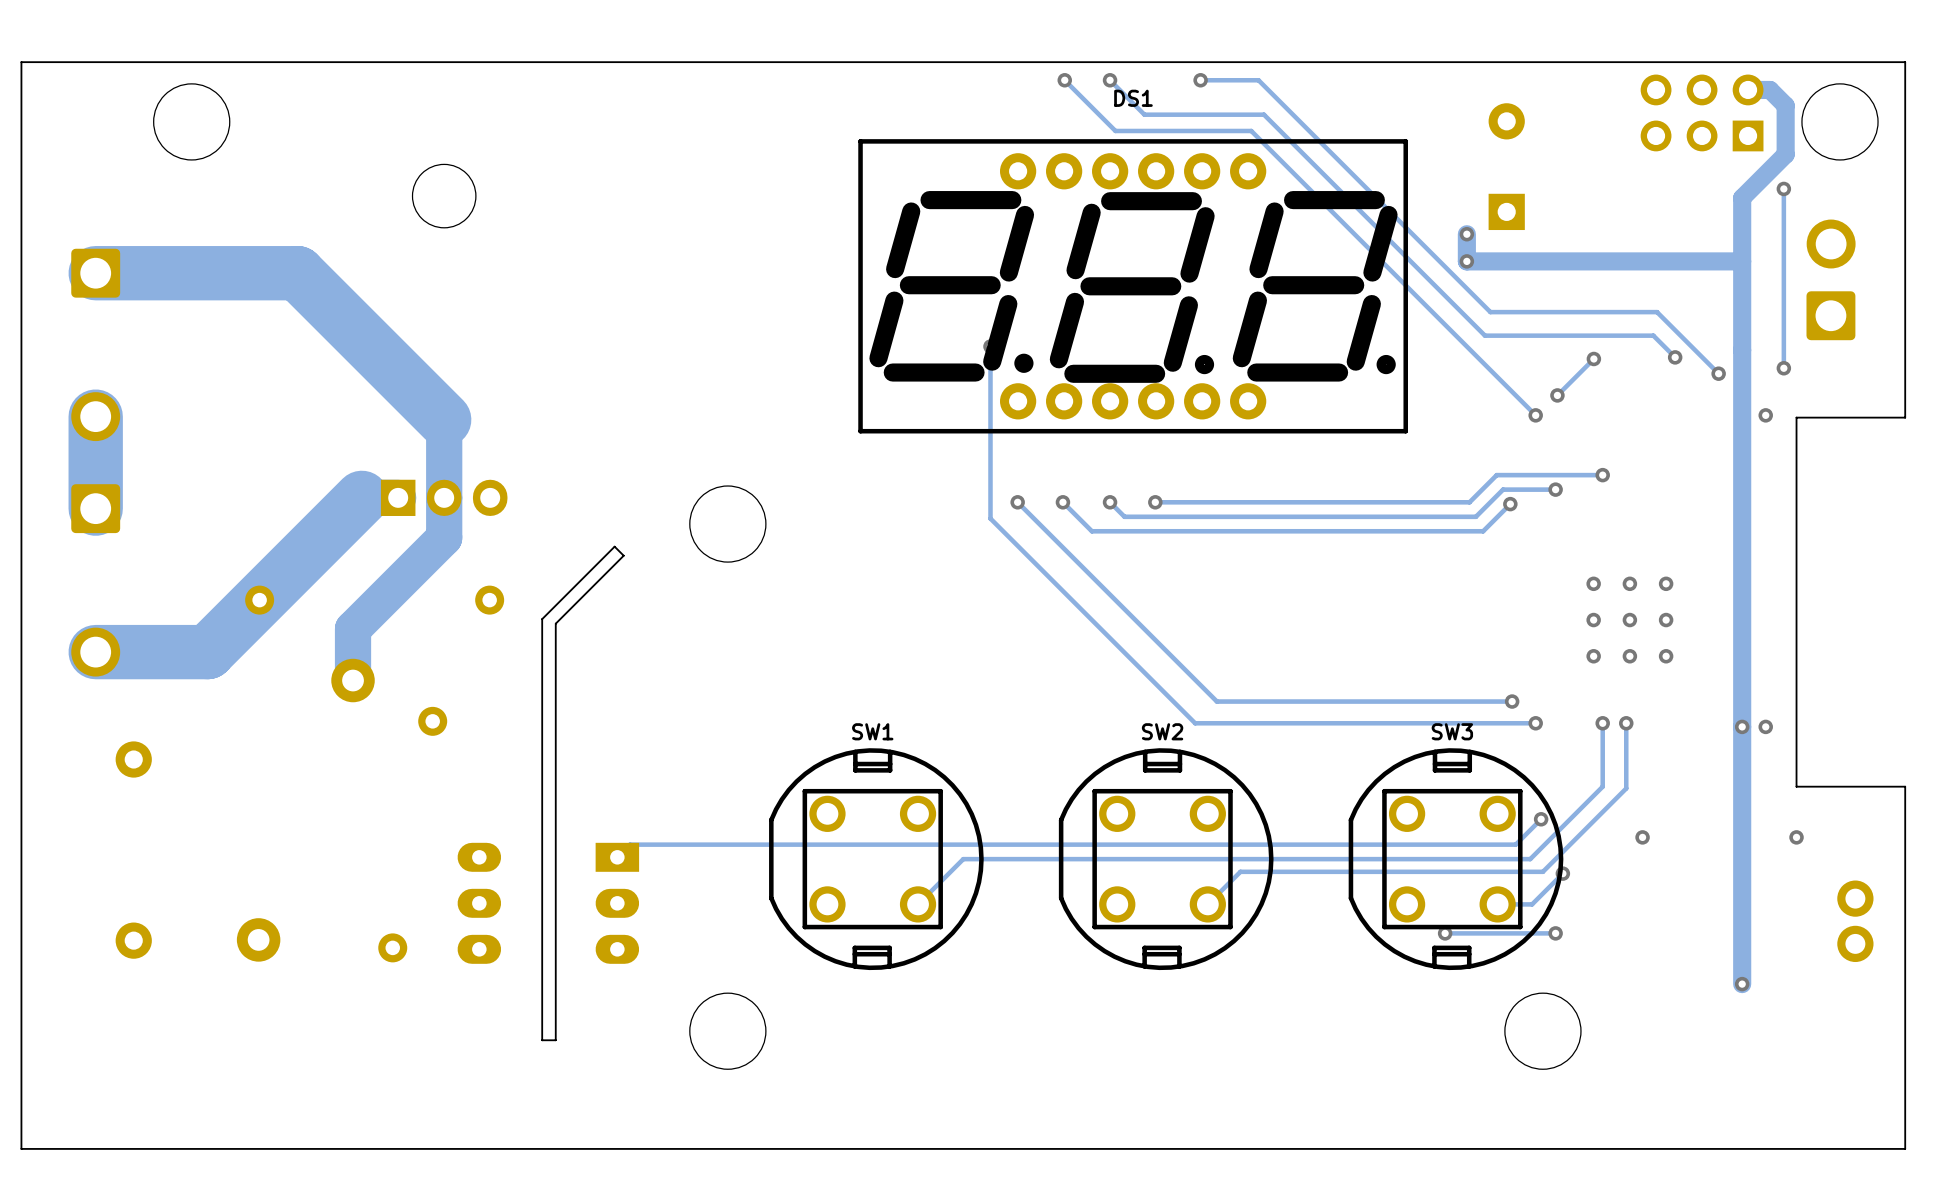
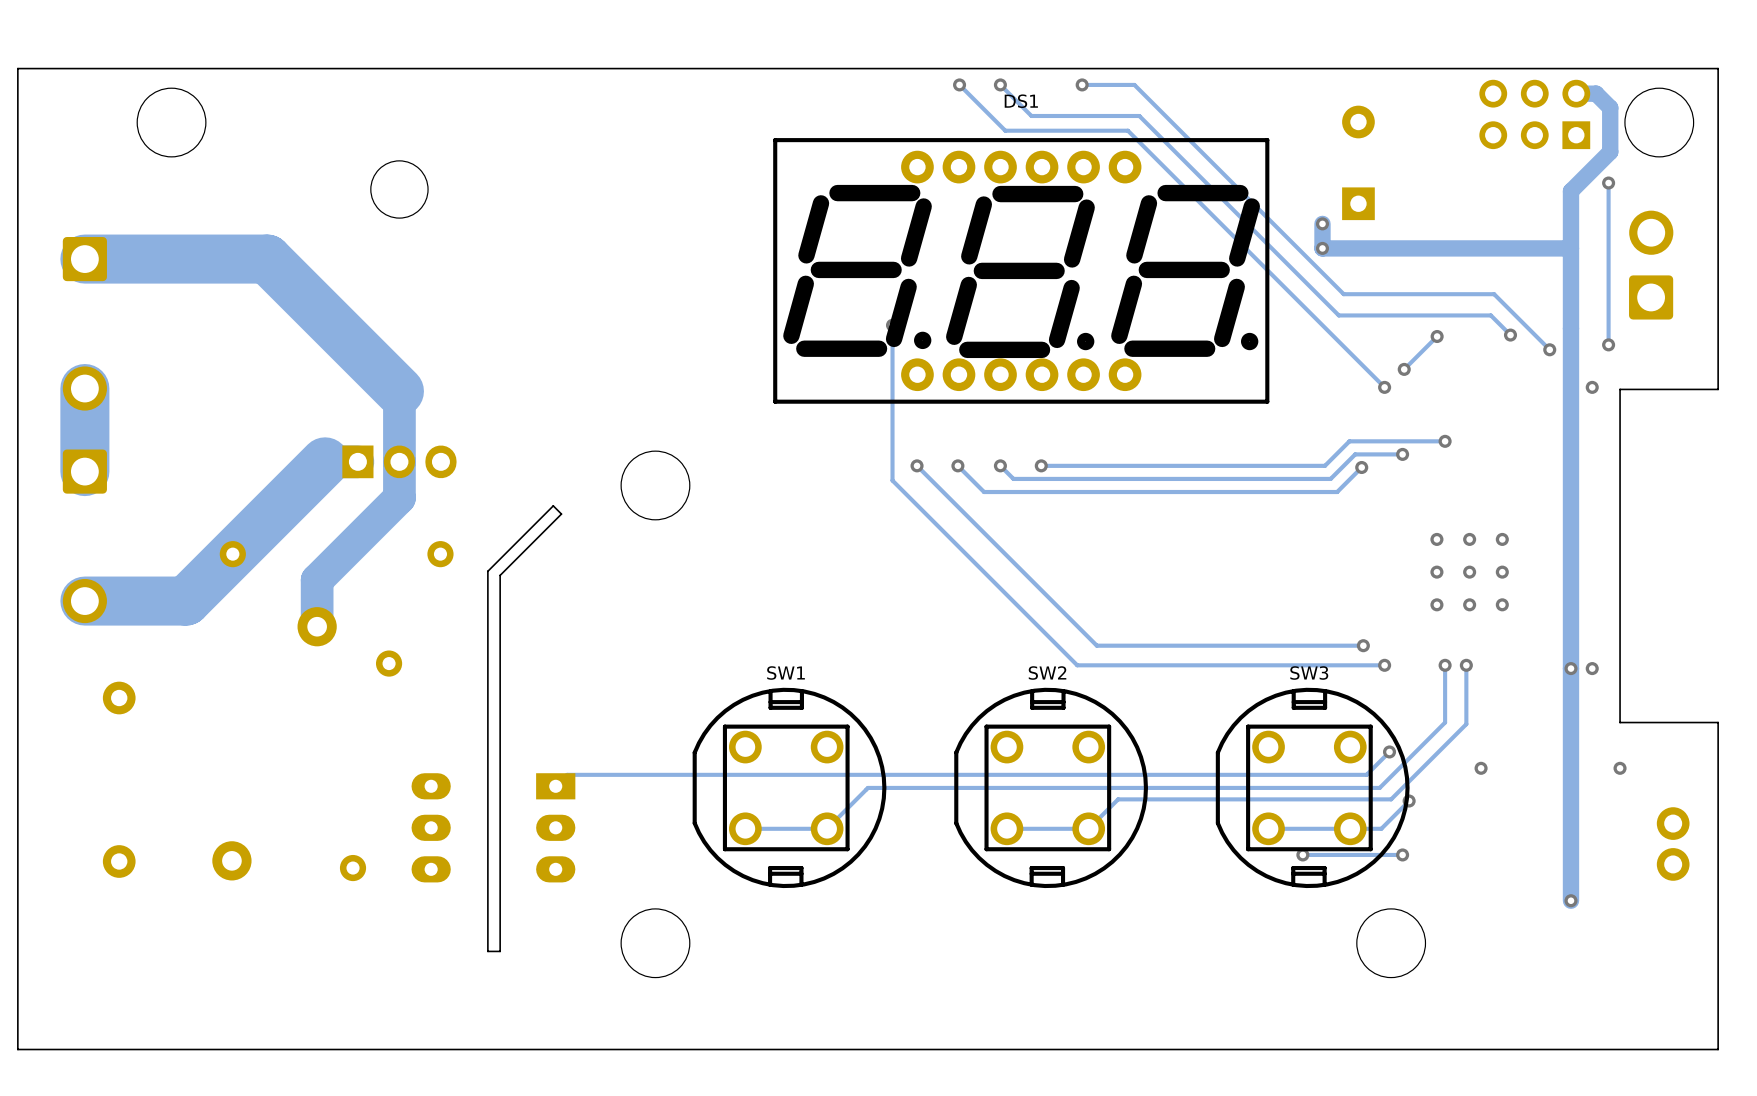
track: none -> (827, 828) (745, 828)
track: none -> (1088, 828) (1006, 828)
track: none -> (1350, 828) (1268, 828)

